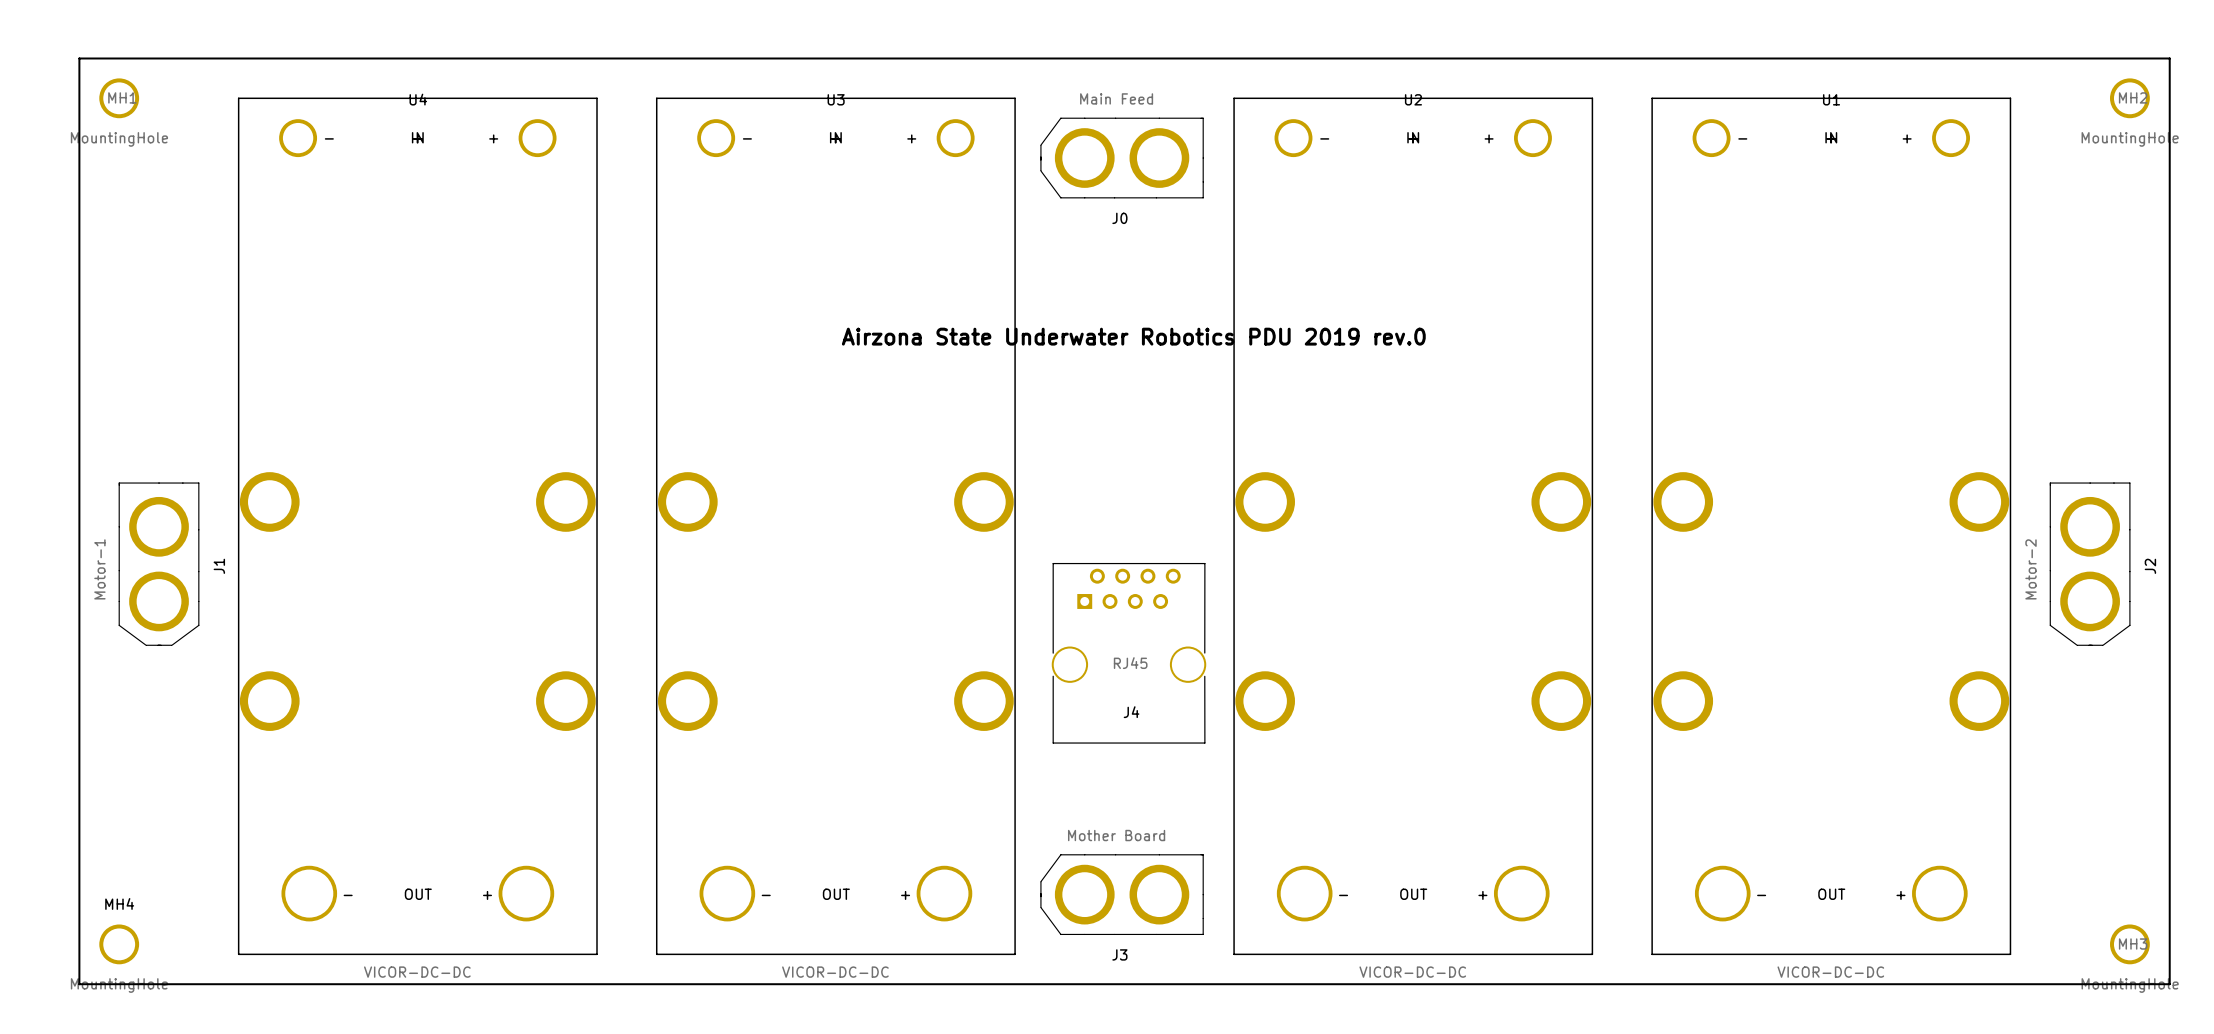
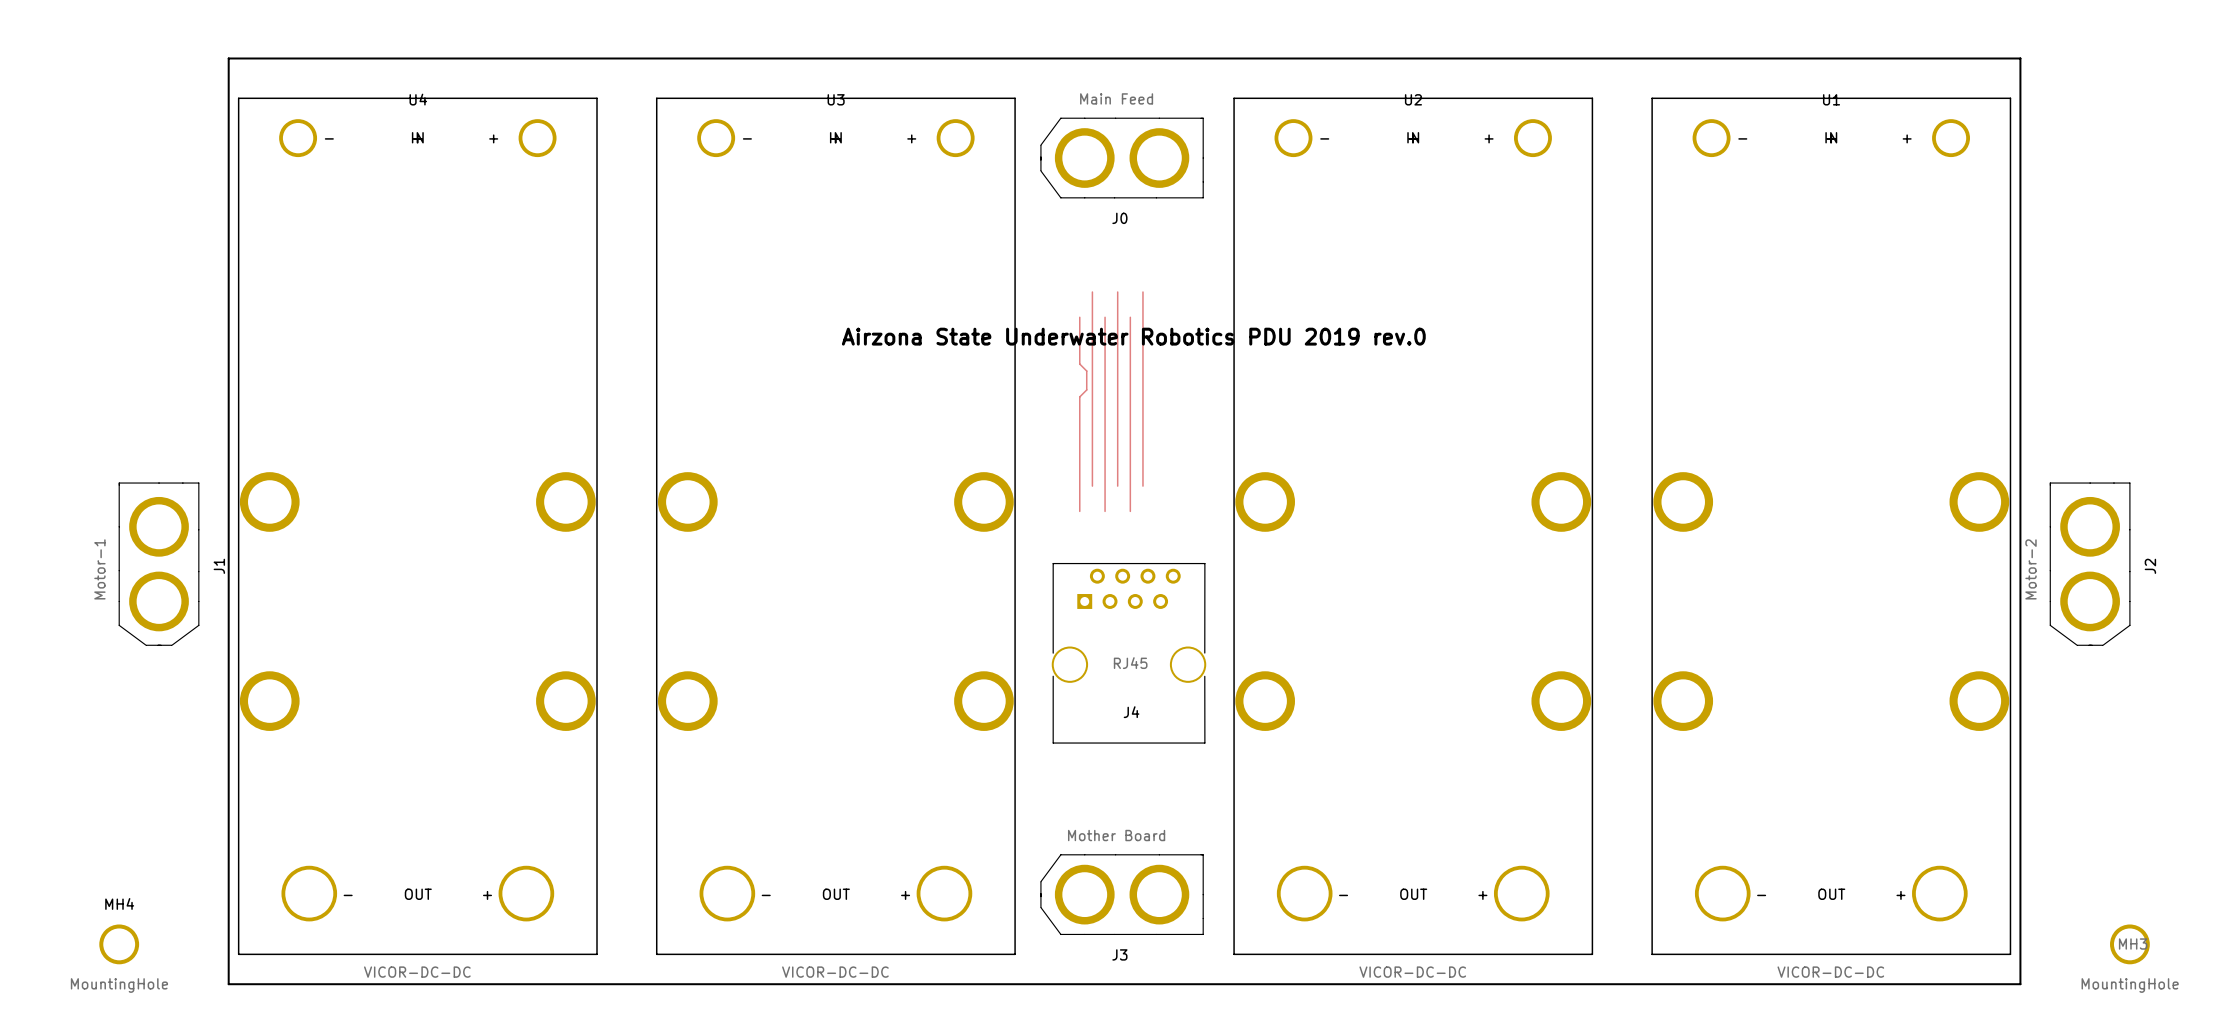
board edge: (228, 58) (79, 58) (79, 984) (228, 984) -> (228, 58) (228, 984)
board edge: (2020, 58) (2169, 58) (2169, 984) (2020, 984) -> (2020, 58) (2020, 984)
MH1: MountingHole (119, 98) -> none
MH2: MountingHole (2129, 98) -> none
track: none -> (1092, 292) (1092, 486)
track: none -> (1117, 292) (1117, 486)
track: none -> (1142, 292) (1142, 486)
track: none -> (1079, 317) (1079, 364) (1086, 371) (1086, 389) (1079, 396) (1079, 511)
track: none -> (1105, 317) (1105, 511)
track: none -> (1130, 317) (1130, 511)

